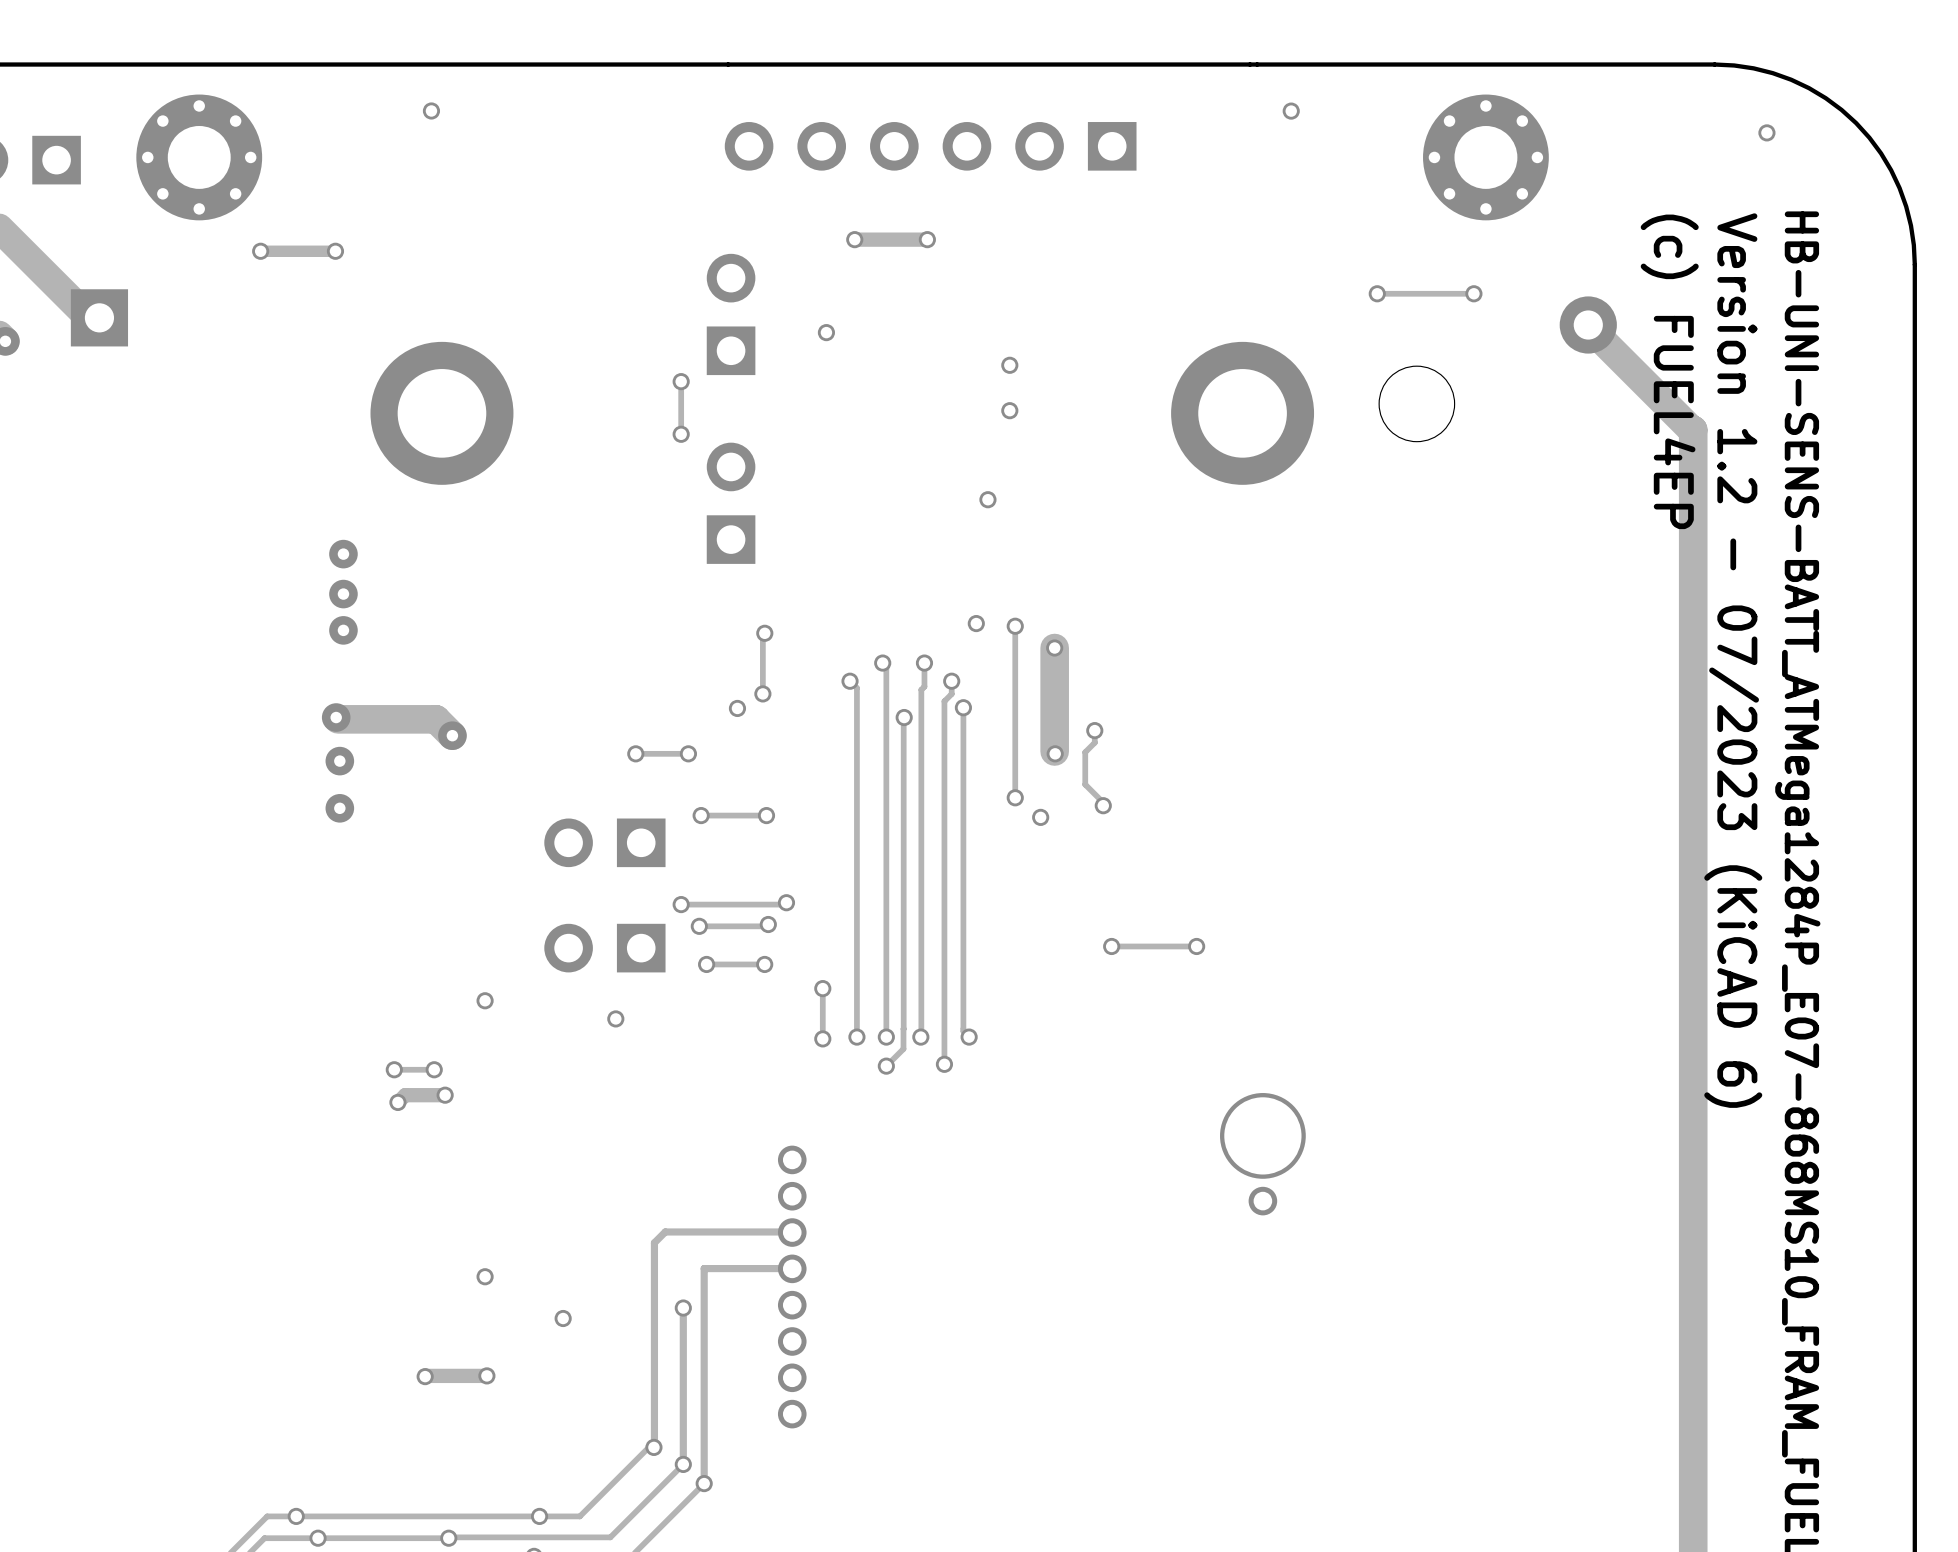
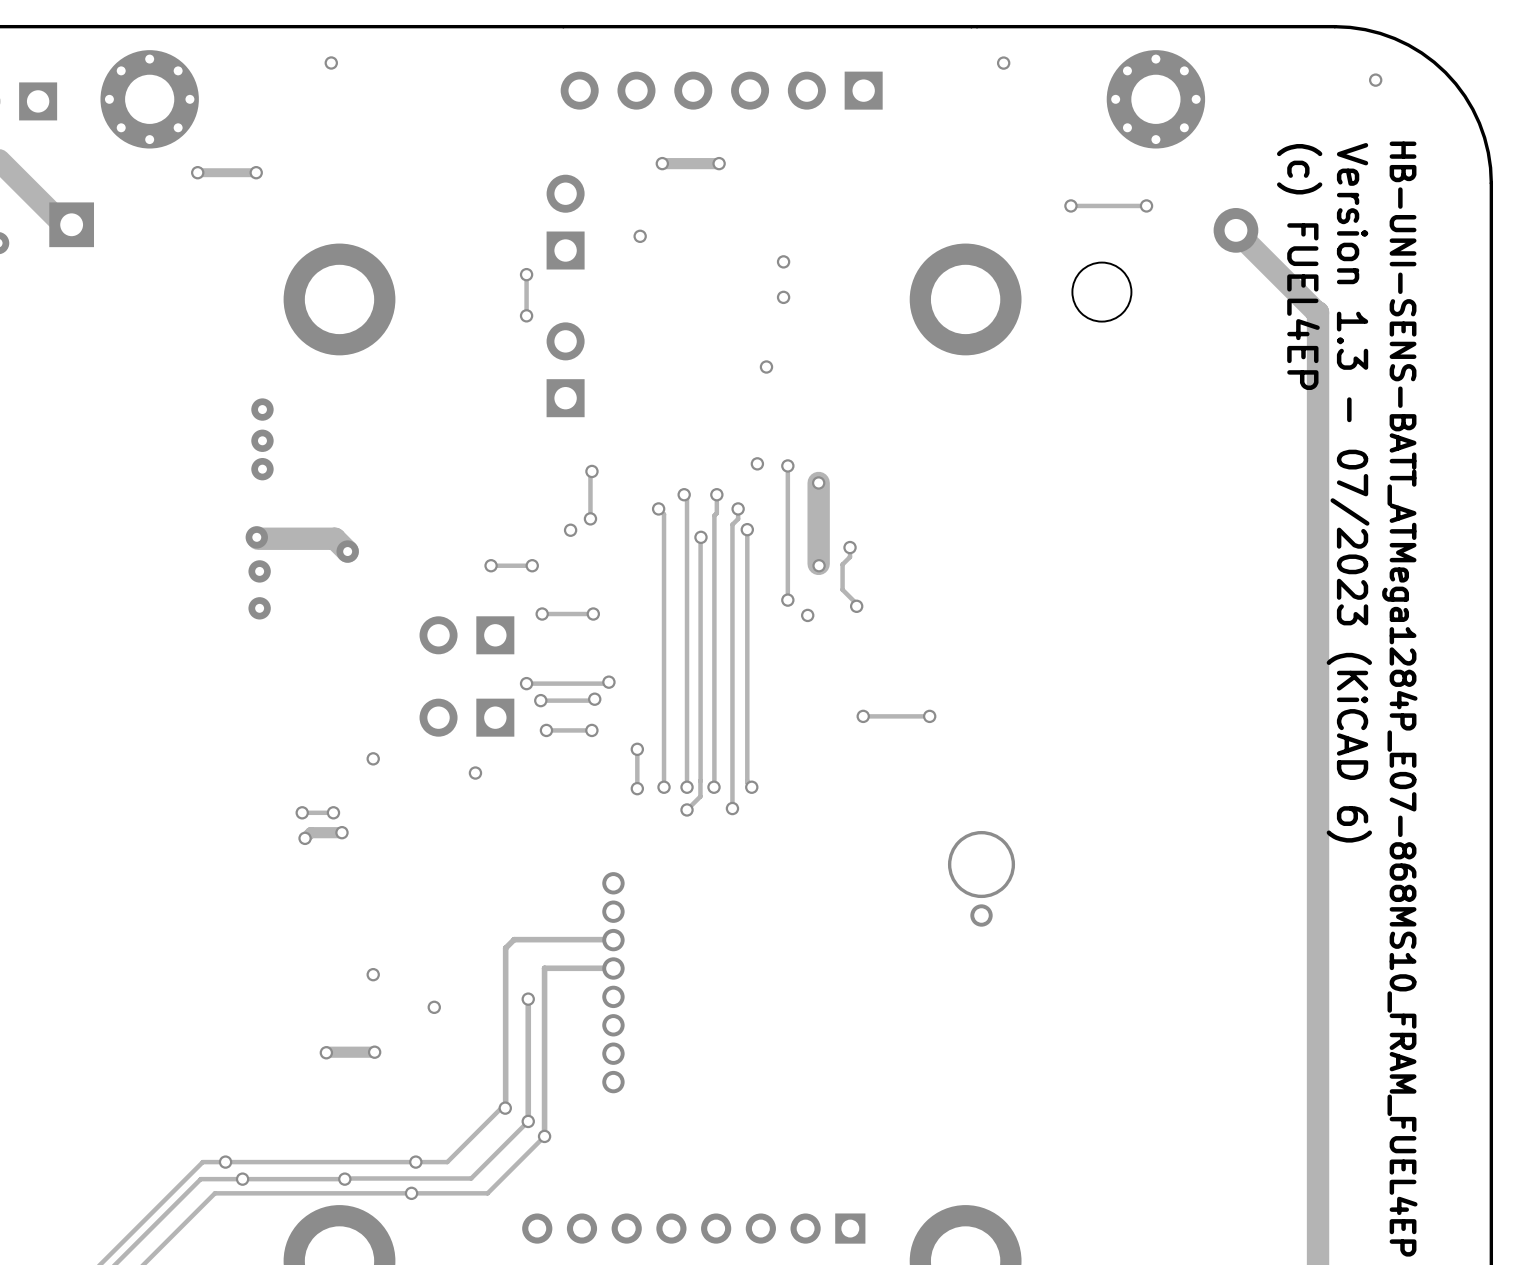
text: Version 1.2 - 07/2023 (KiCAD 6) (1733, 660) -> Version 1.3 - 07/2023 (KiCAD 6) (1349, 492)

